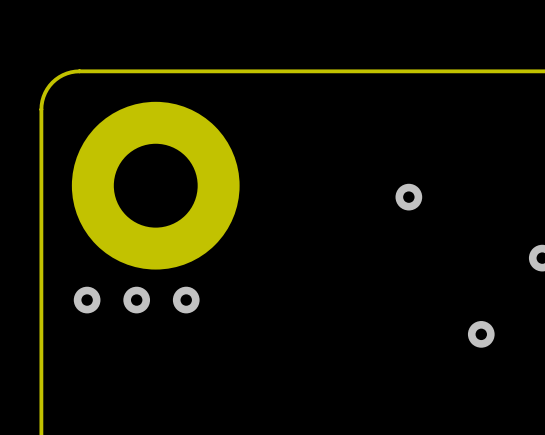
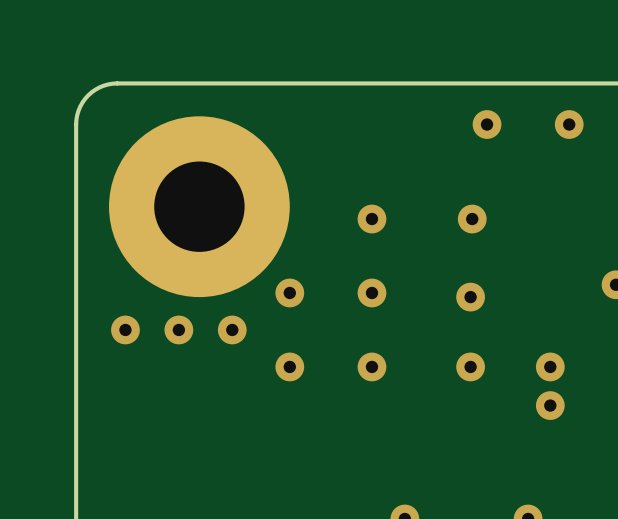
via: none -> (487, 124)
via: none -> (569, 124)
via: none -> (371, 219)
via: none -> (289, 292)
via: none -> (371, 292)
via: none -> (470, 297)
via: none -> (289, 366)
via: none -> (371, 366)
via: none -> (470, 366)
via: none -> (550, 405)

